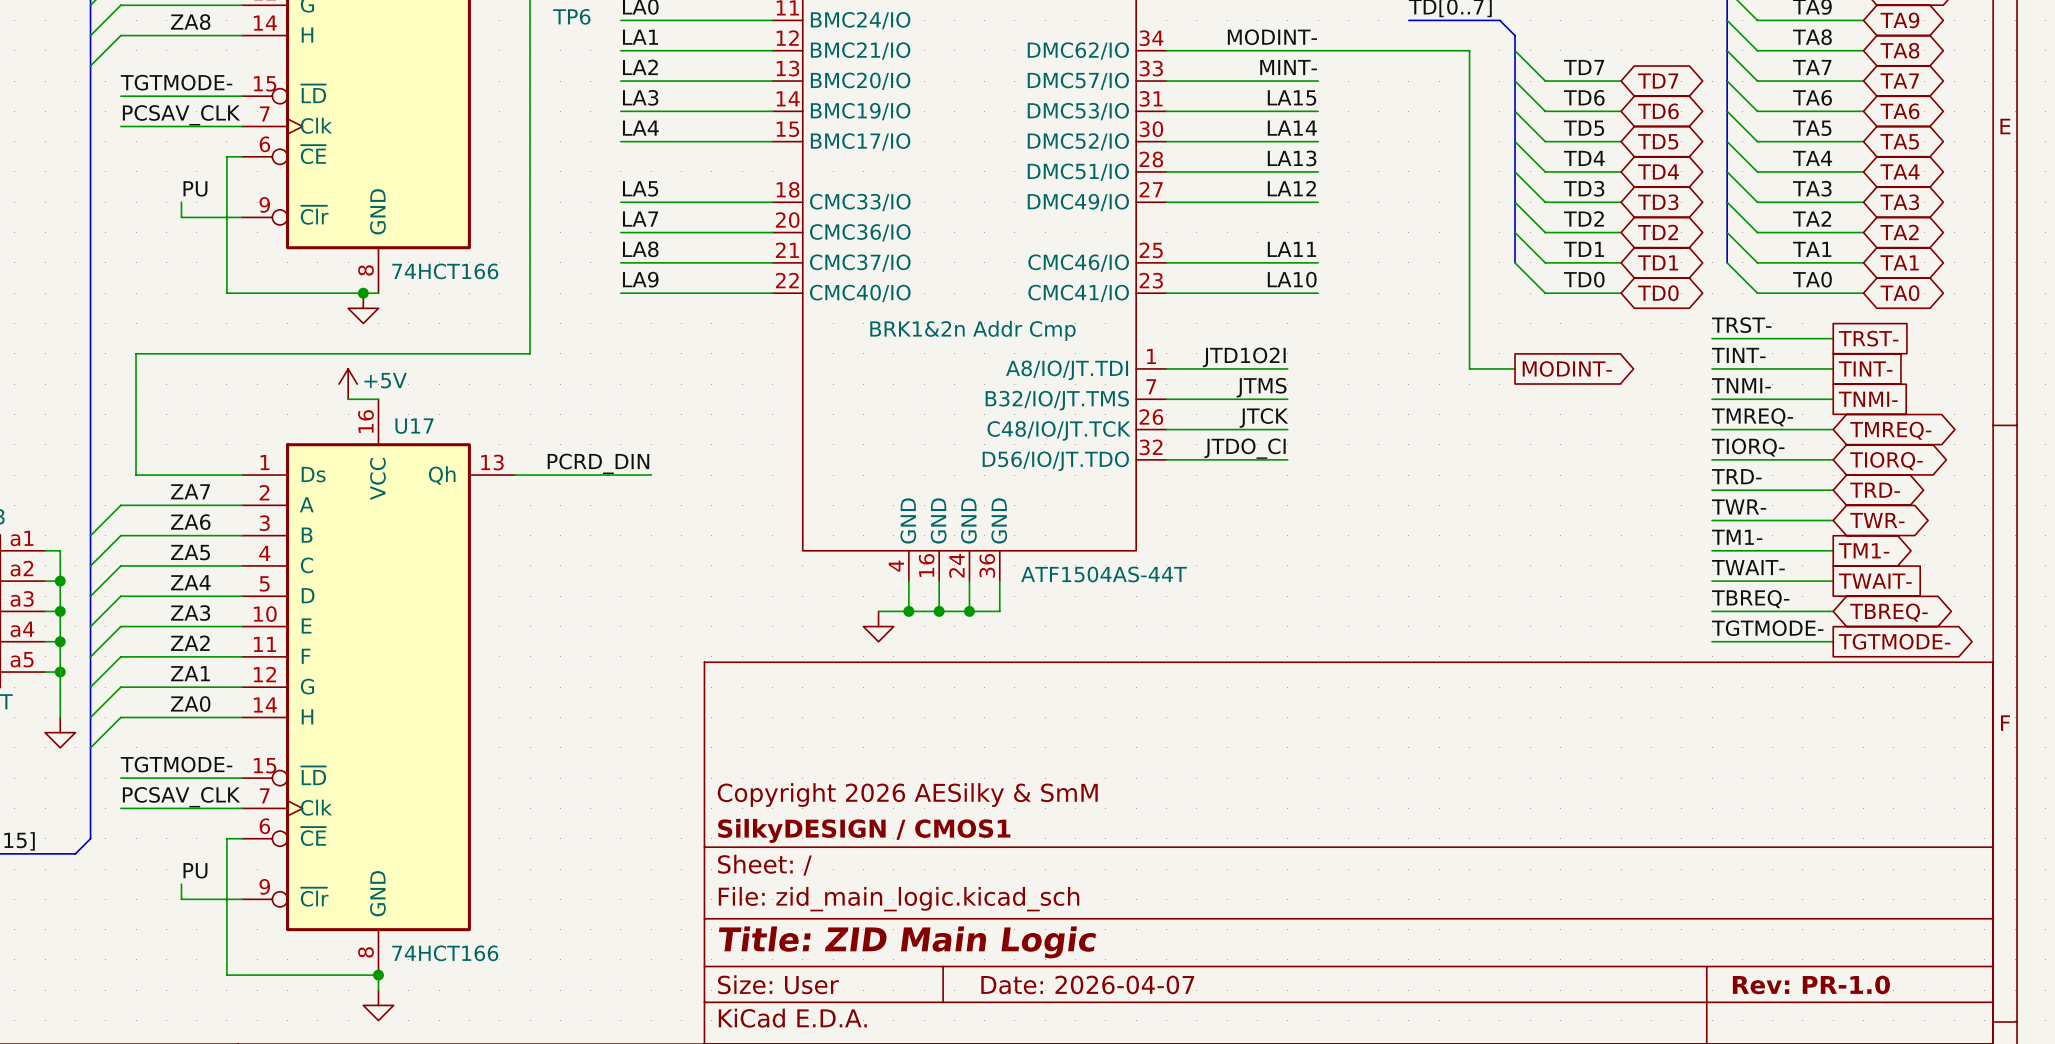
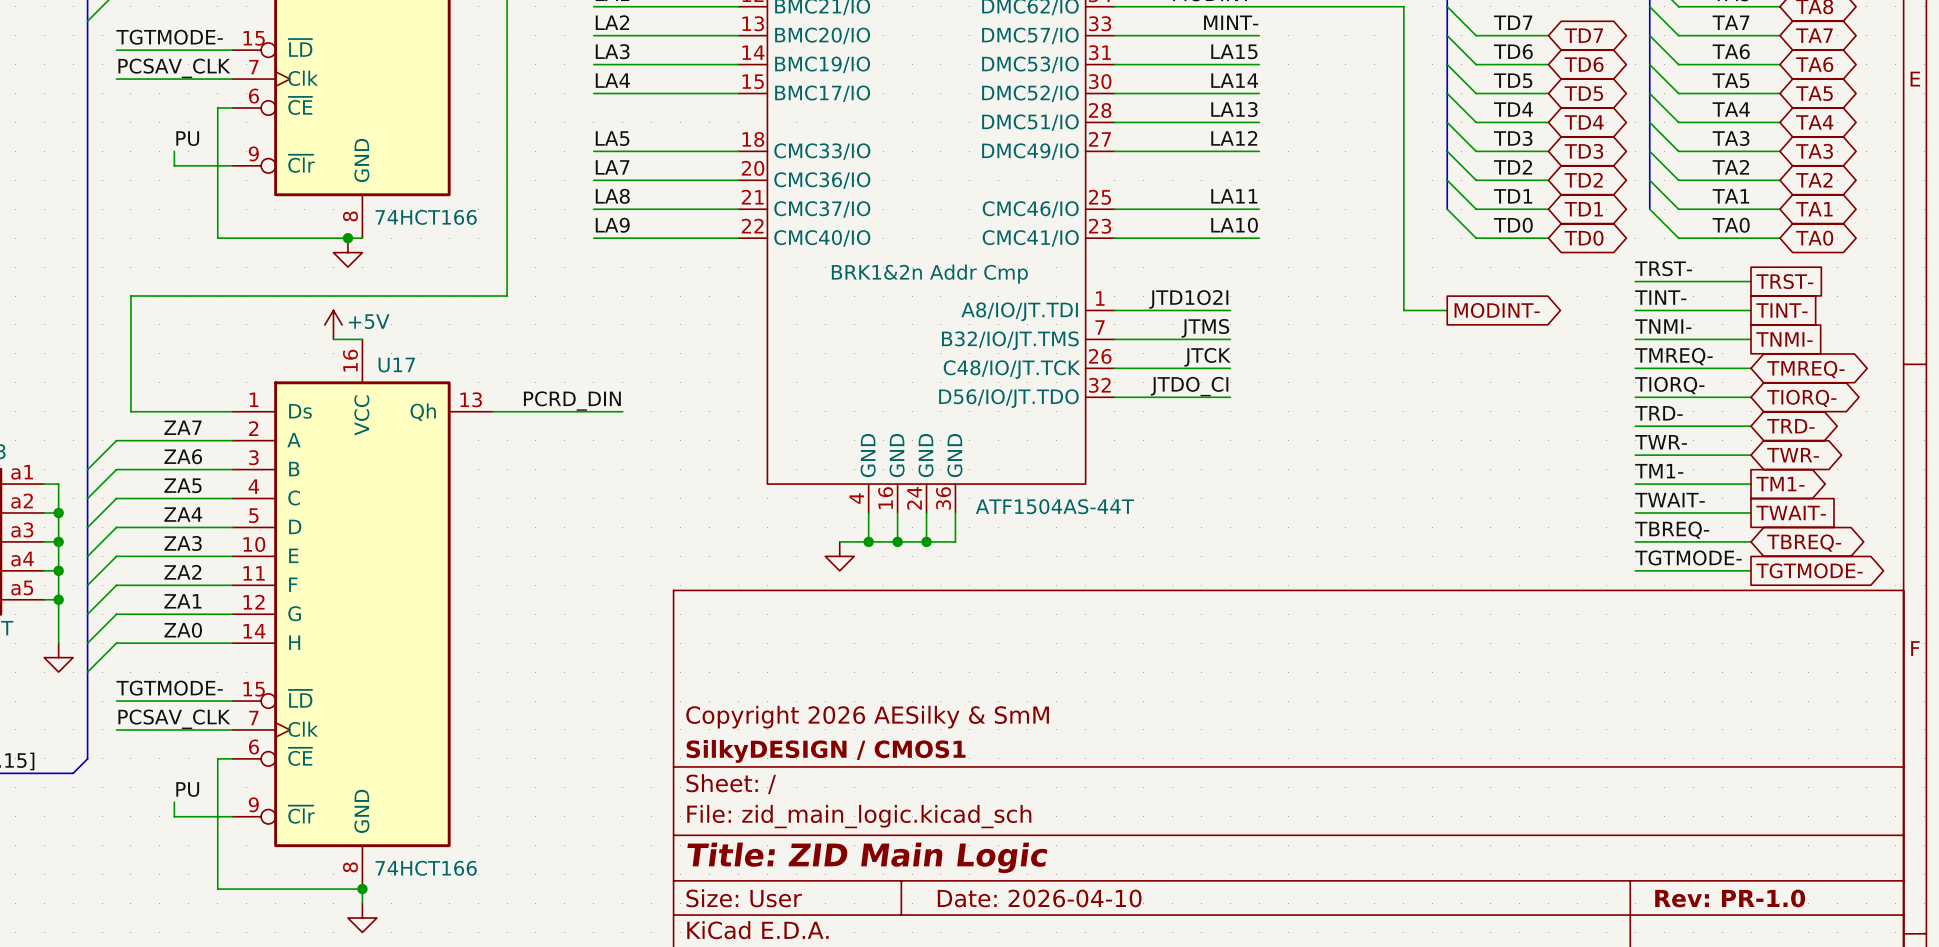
title block: Date: 2026-04-07 (1087, 984) -> Date: 2026-04-10 (1039, 898)

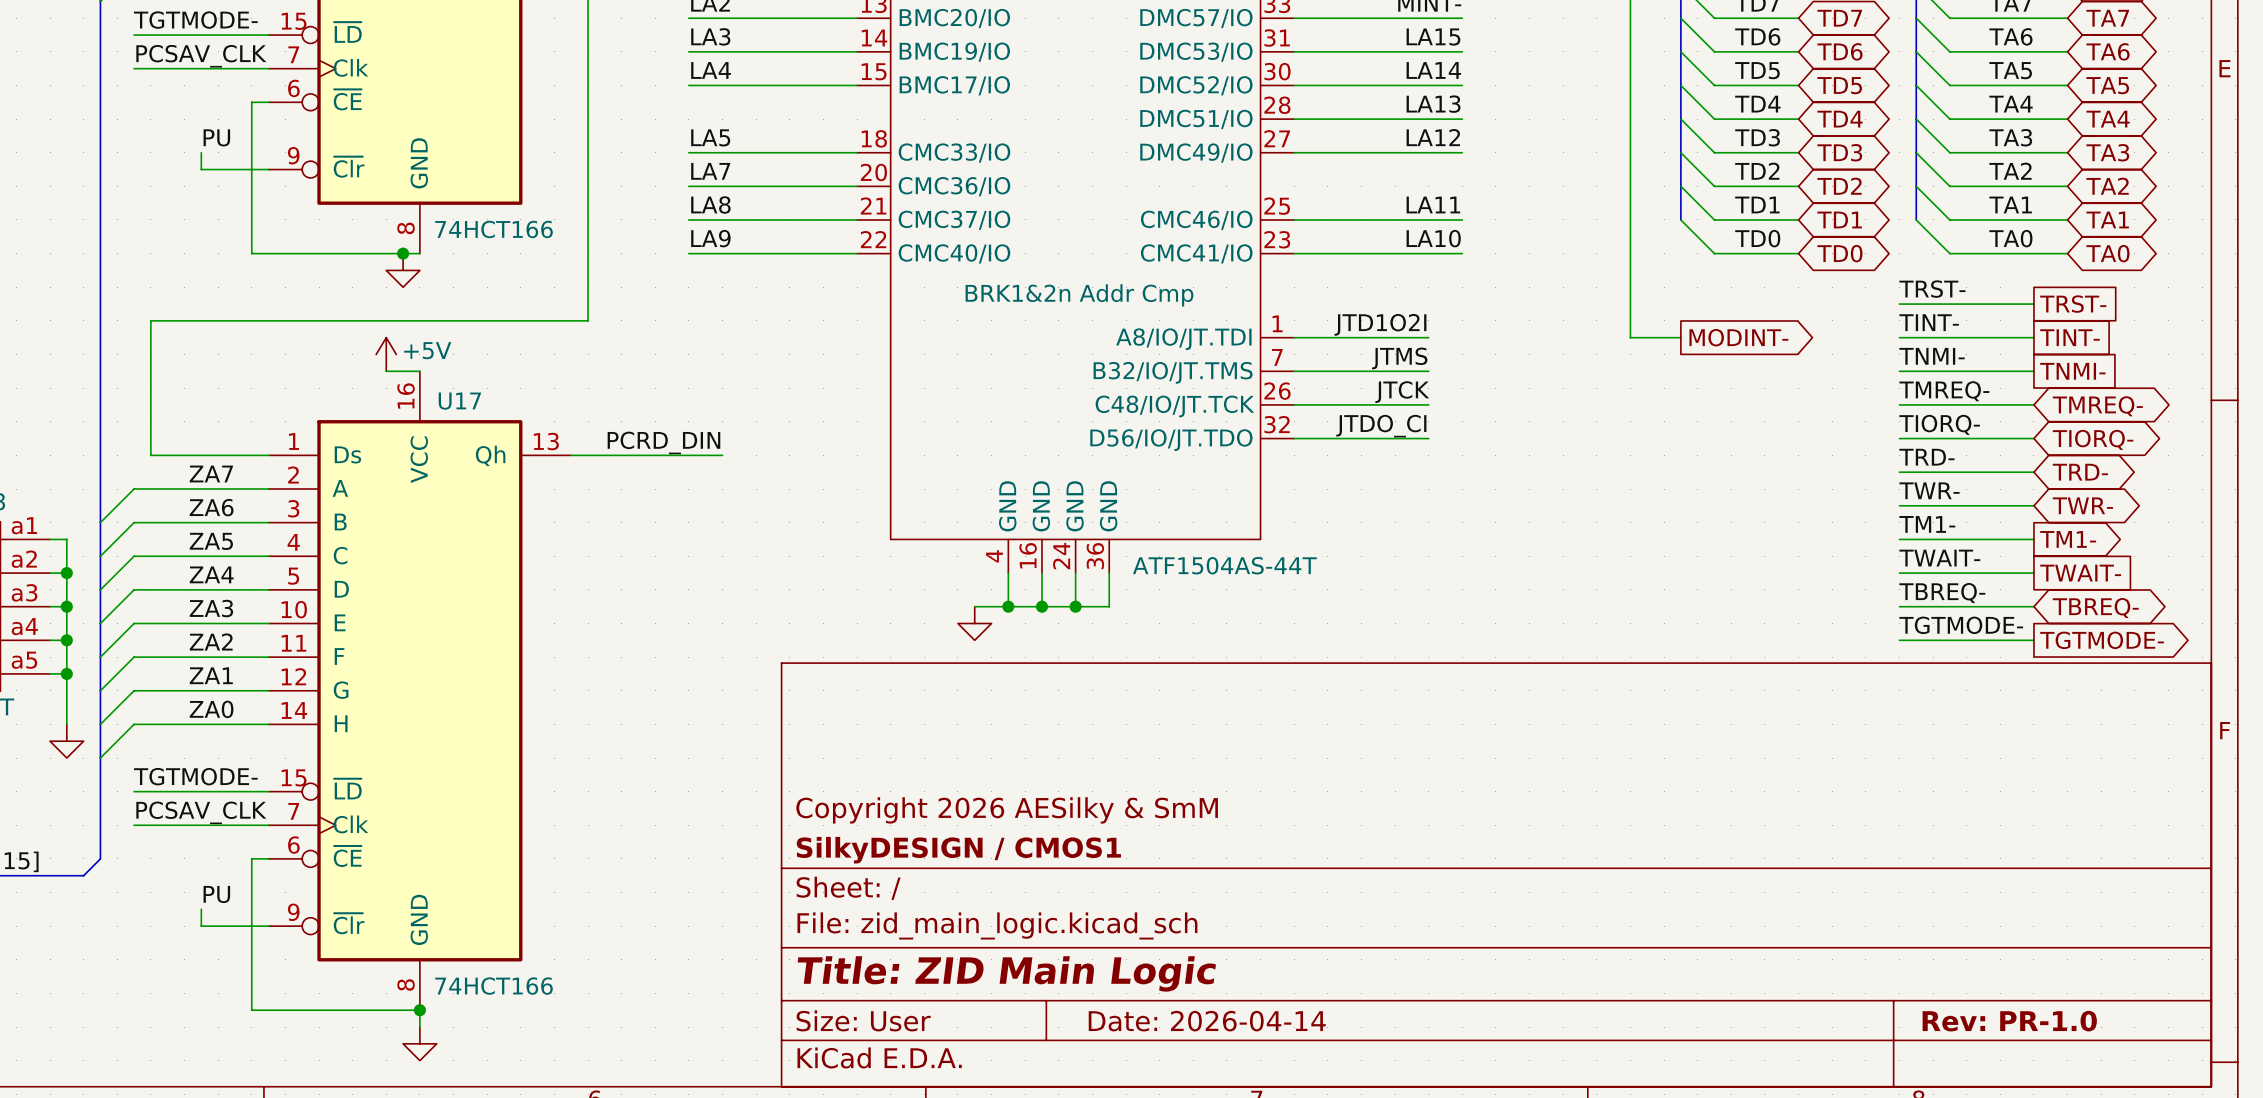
title block: Date: 2026-04-10 (1039, 898) -> Date: 2026-04-14 (1207, 1021)

